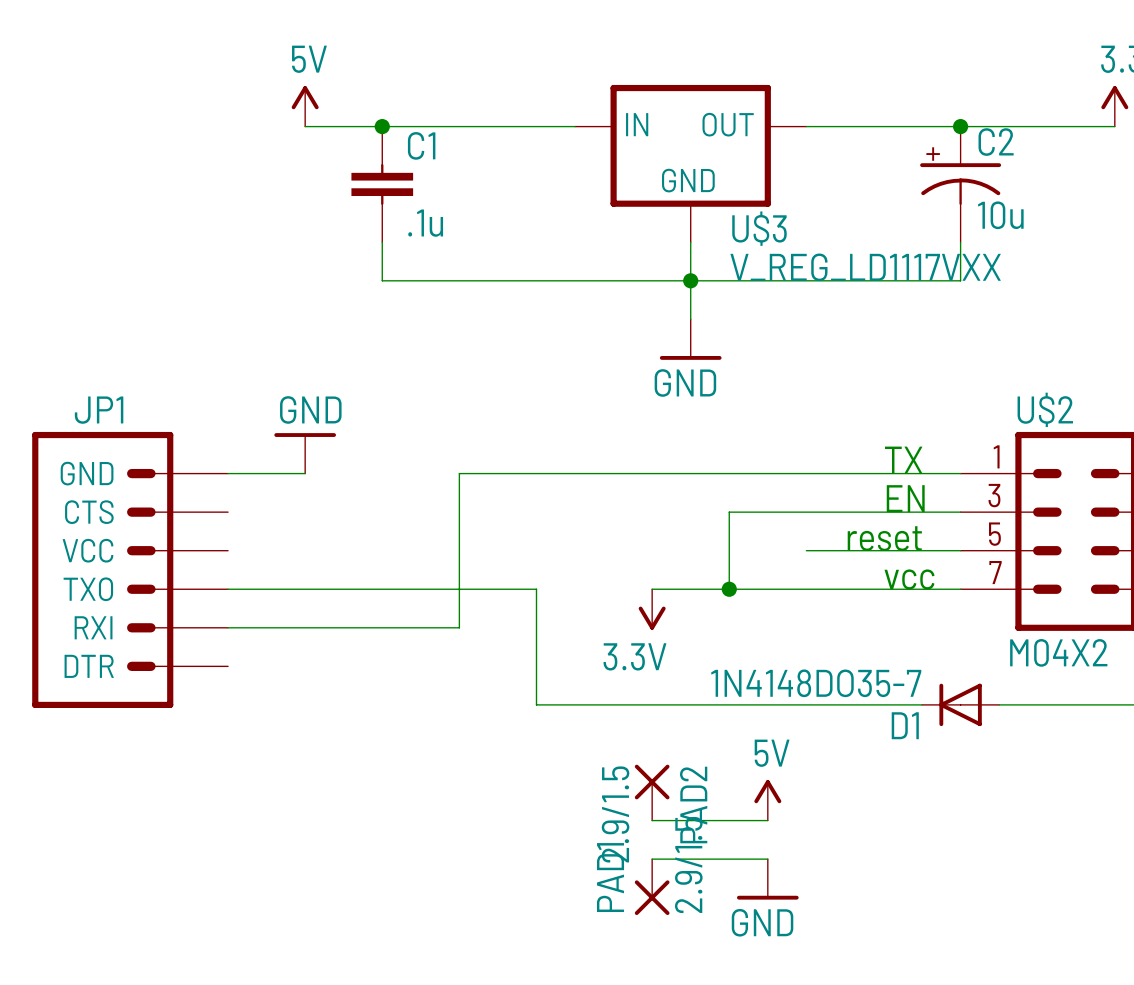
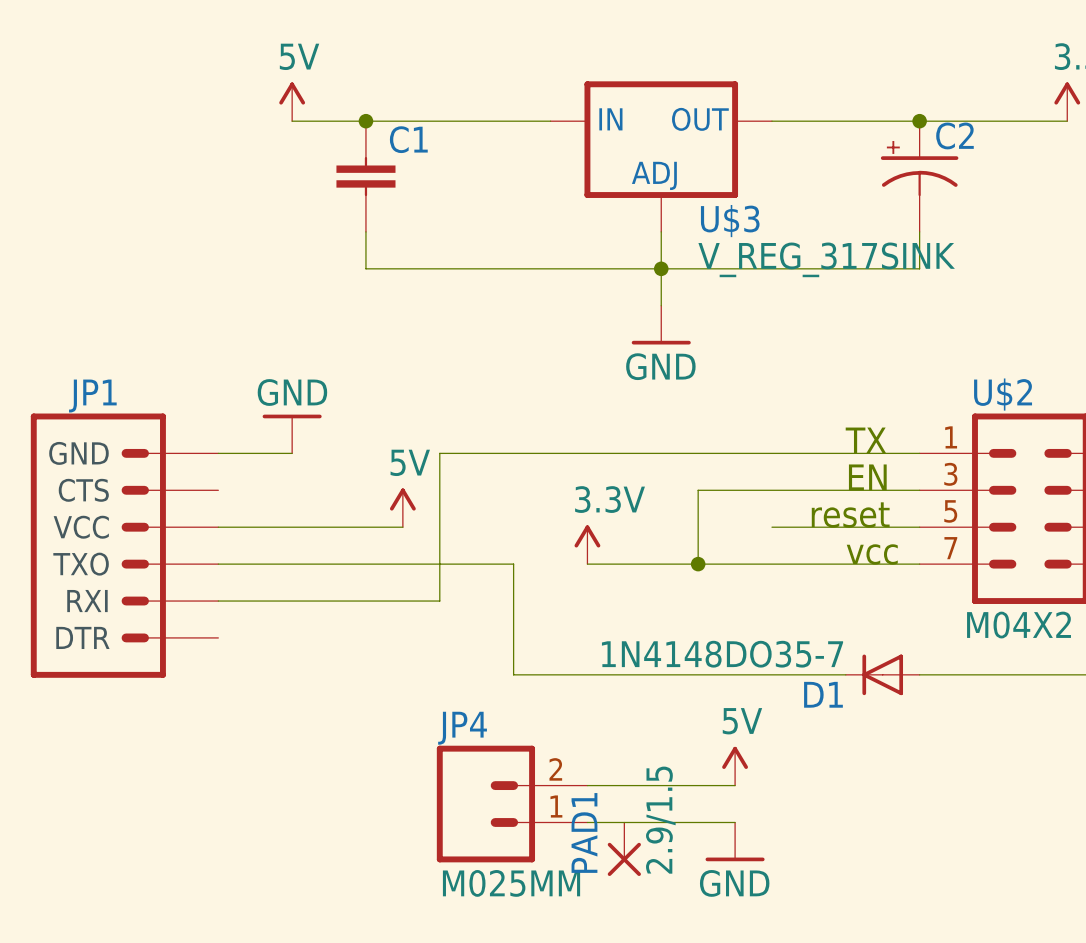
U$3 text: GND (688, 180) -> ADJ (654, 175)
C2 value: 10u (1000, 215) -> none
C1 value: .1u (425, 223) -> none
U$3 value: V_REG_LD1117VXX (865, 267) -> V_REG_317SINK (826, 259)
power symbol: none -> 5V (402, 507)
wire: none -> (218, 527) (402, 527)
wire: none -> (587, 564) (624, 564)
power symbol position: 3.3V (652, 609) -> 3.3V (587, 544)
power symbol rotation: 0° (652, 618) -> 180° (587, 536)
D1 position: (960, 704) -> (882, 674)
PAD2: 2.9/1.5 (652, 792) -> none
wire: none -> (587, 785) (624, 785)
JP4: none -> M025MM (512, 804)
wire: none -> (587, 822) (624, 822)

